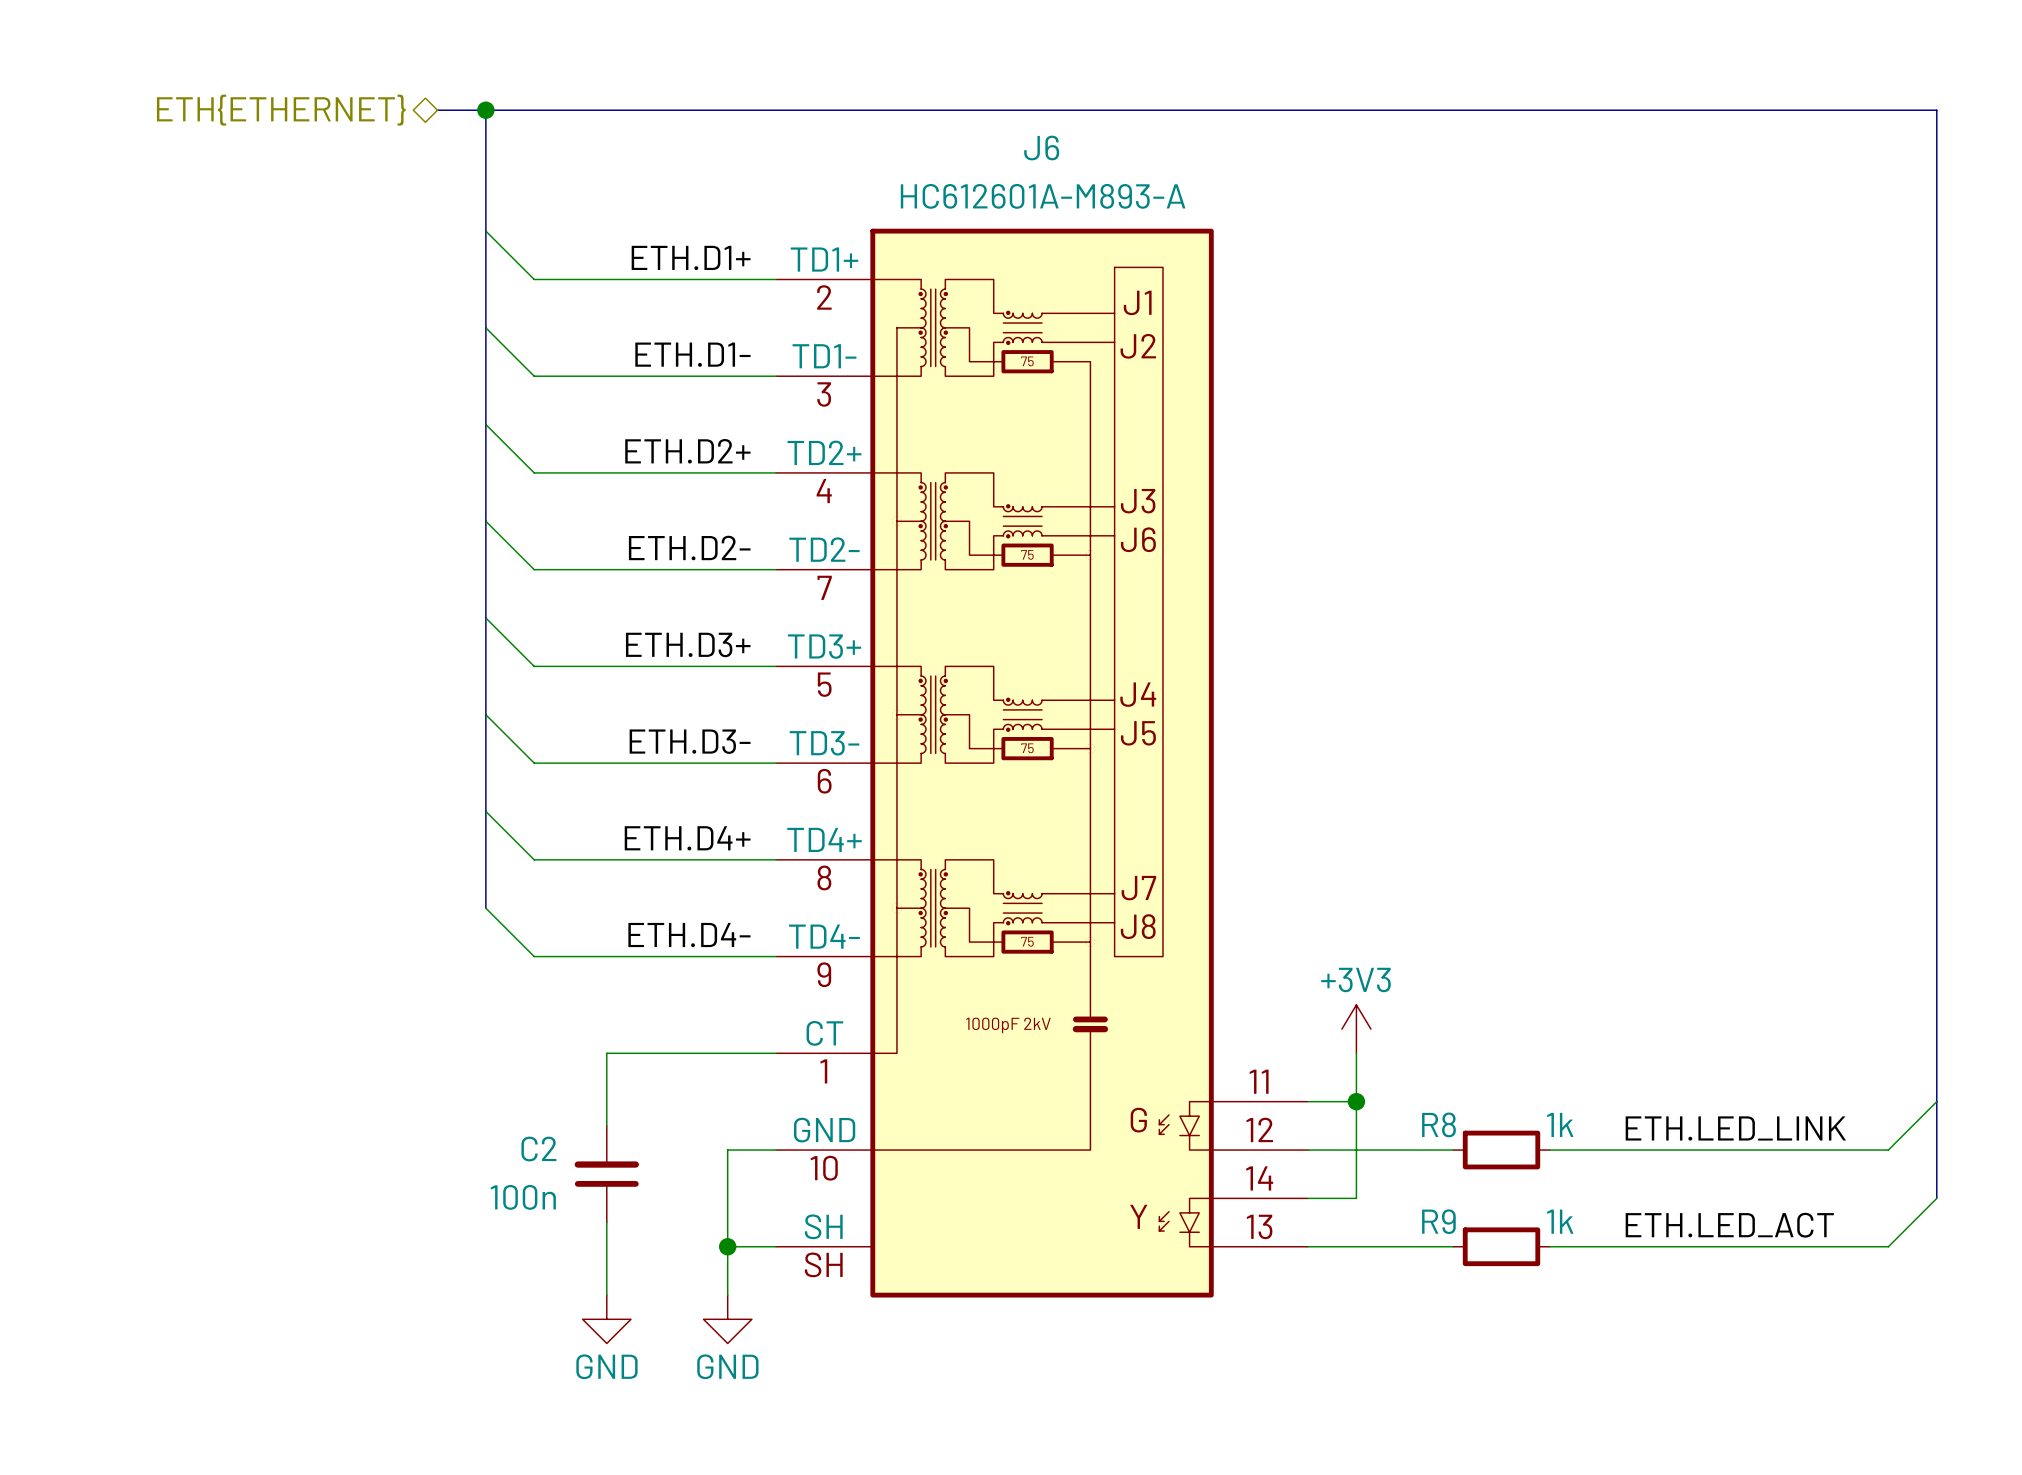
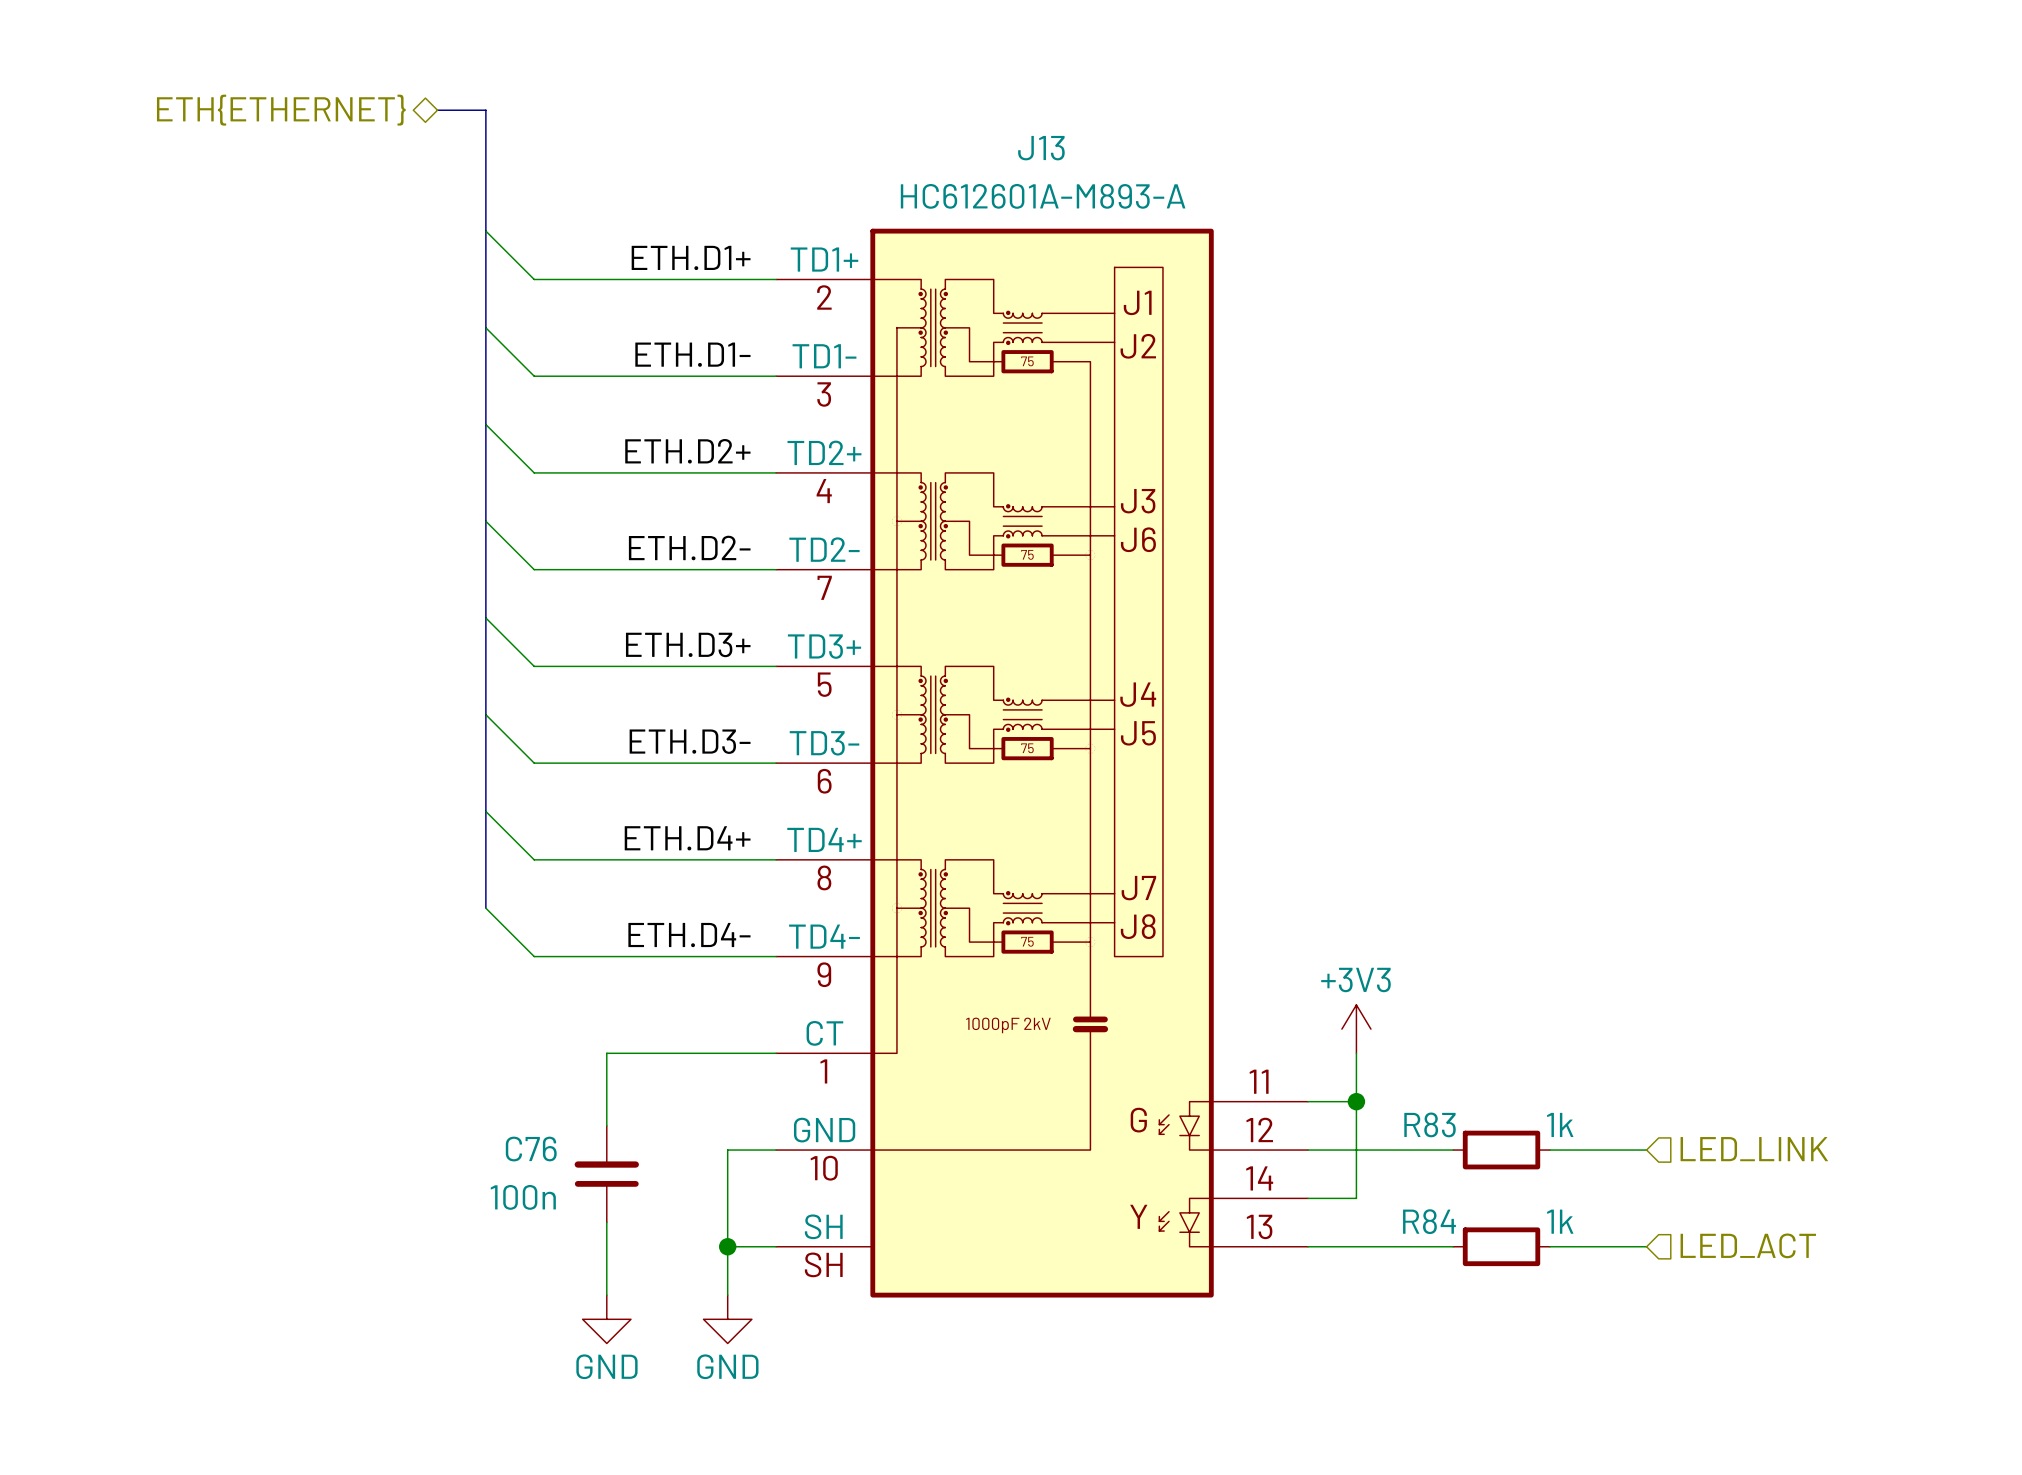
bus: (485, 110) (1936, 110) (1936, 1198) -> none
junction: (485, 110) -> none
J6 name: J6 (1041, 148) -> J13 (1041, 148)
wire: (1936, 1101) (1888, 1150) (1646, 1150) -> none
R8 name: R8 (1438, 1124) -> R83 (1430, 1124)
label: ETH.LED_LINK (1735, 1128) -> none
C2 name: C2 (538, 1149) -> C76 (531, 1149)
hierarchical label: none -> LED_LINK (1754, 1149)
wire: (1936, 1198) (1888, 1246) (1646, 1246) -> none
R9 name: R9 (1438, 1221) -> R84 (1429, 1221)
label: ETH.LED_ACT (1729, 1225) -> none
hierarchical label: none -> LED_ACT (1748, 1245)

